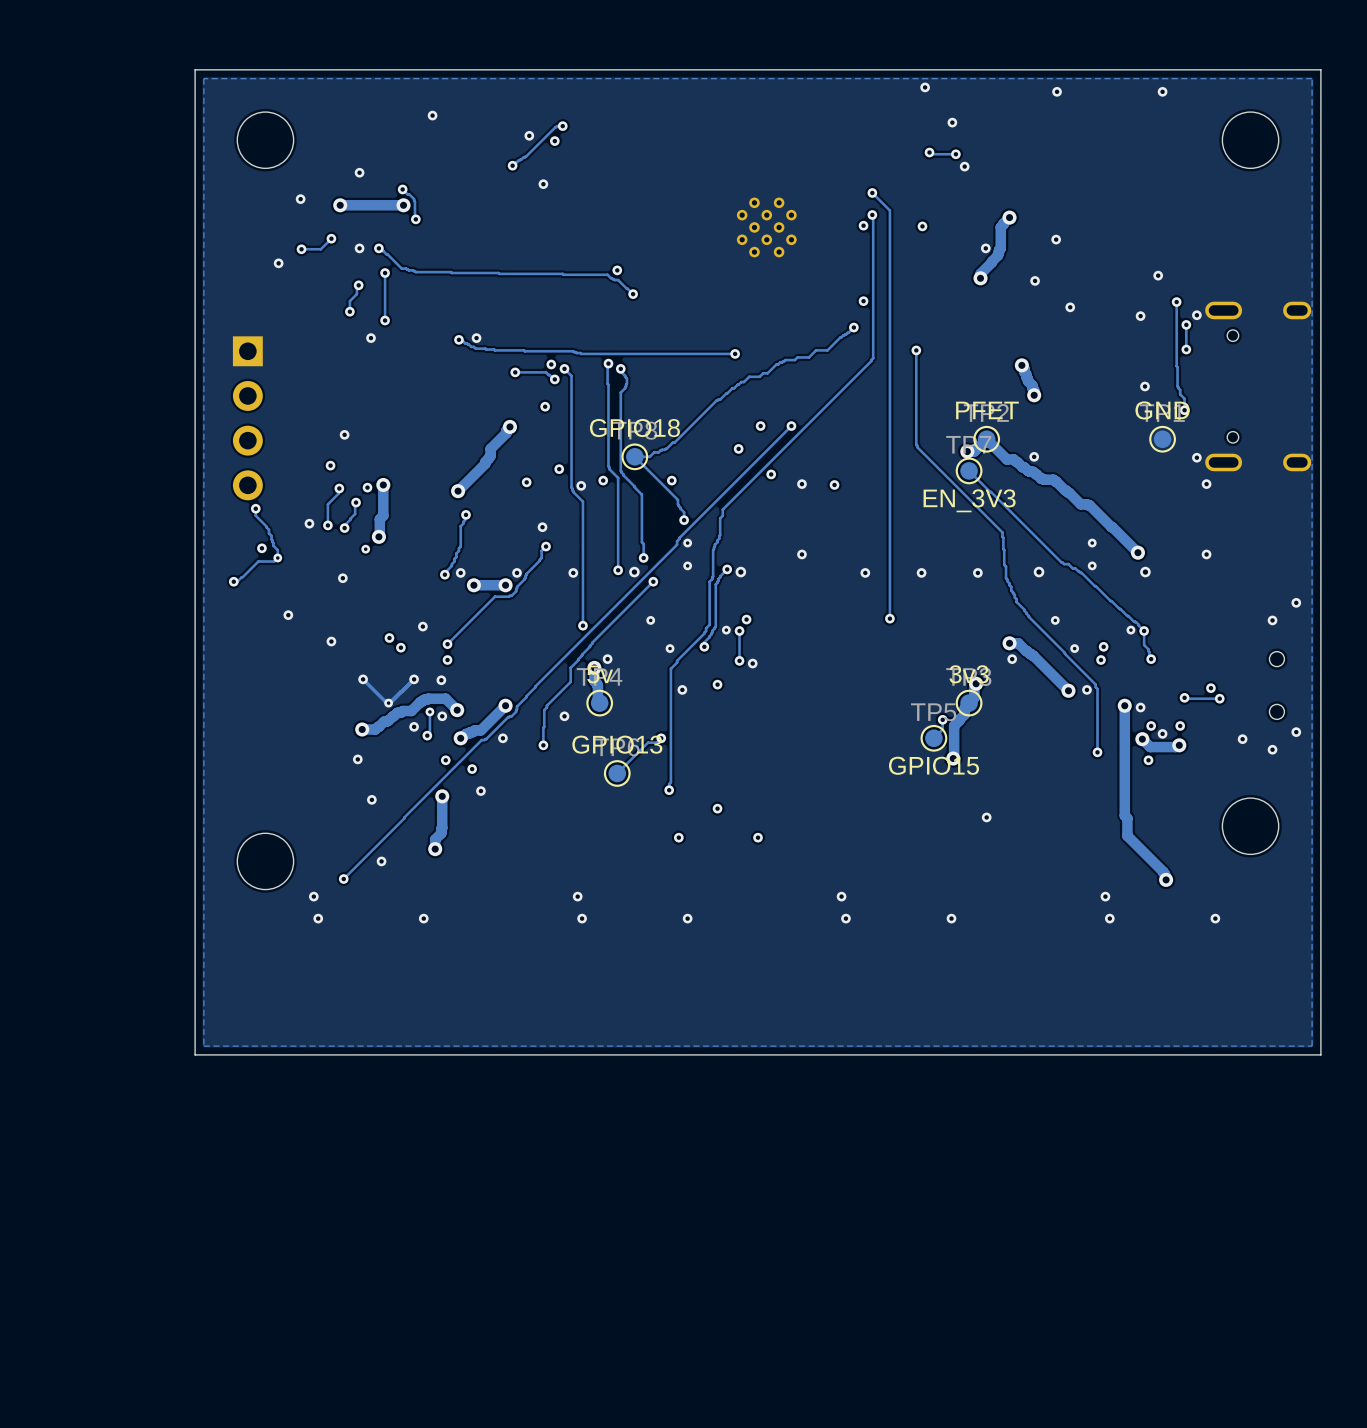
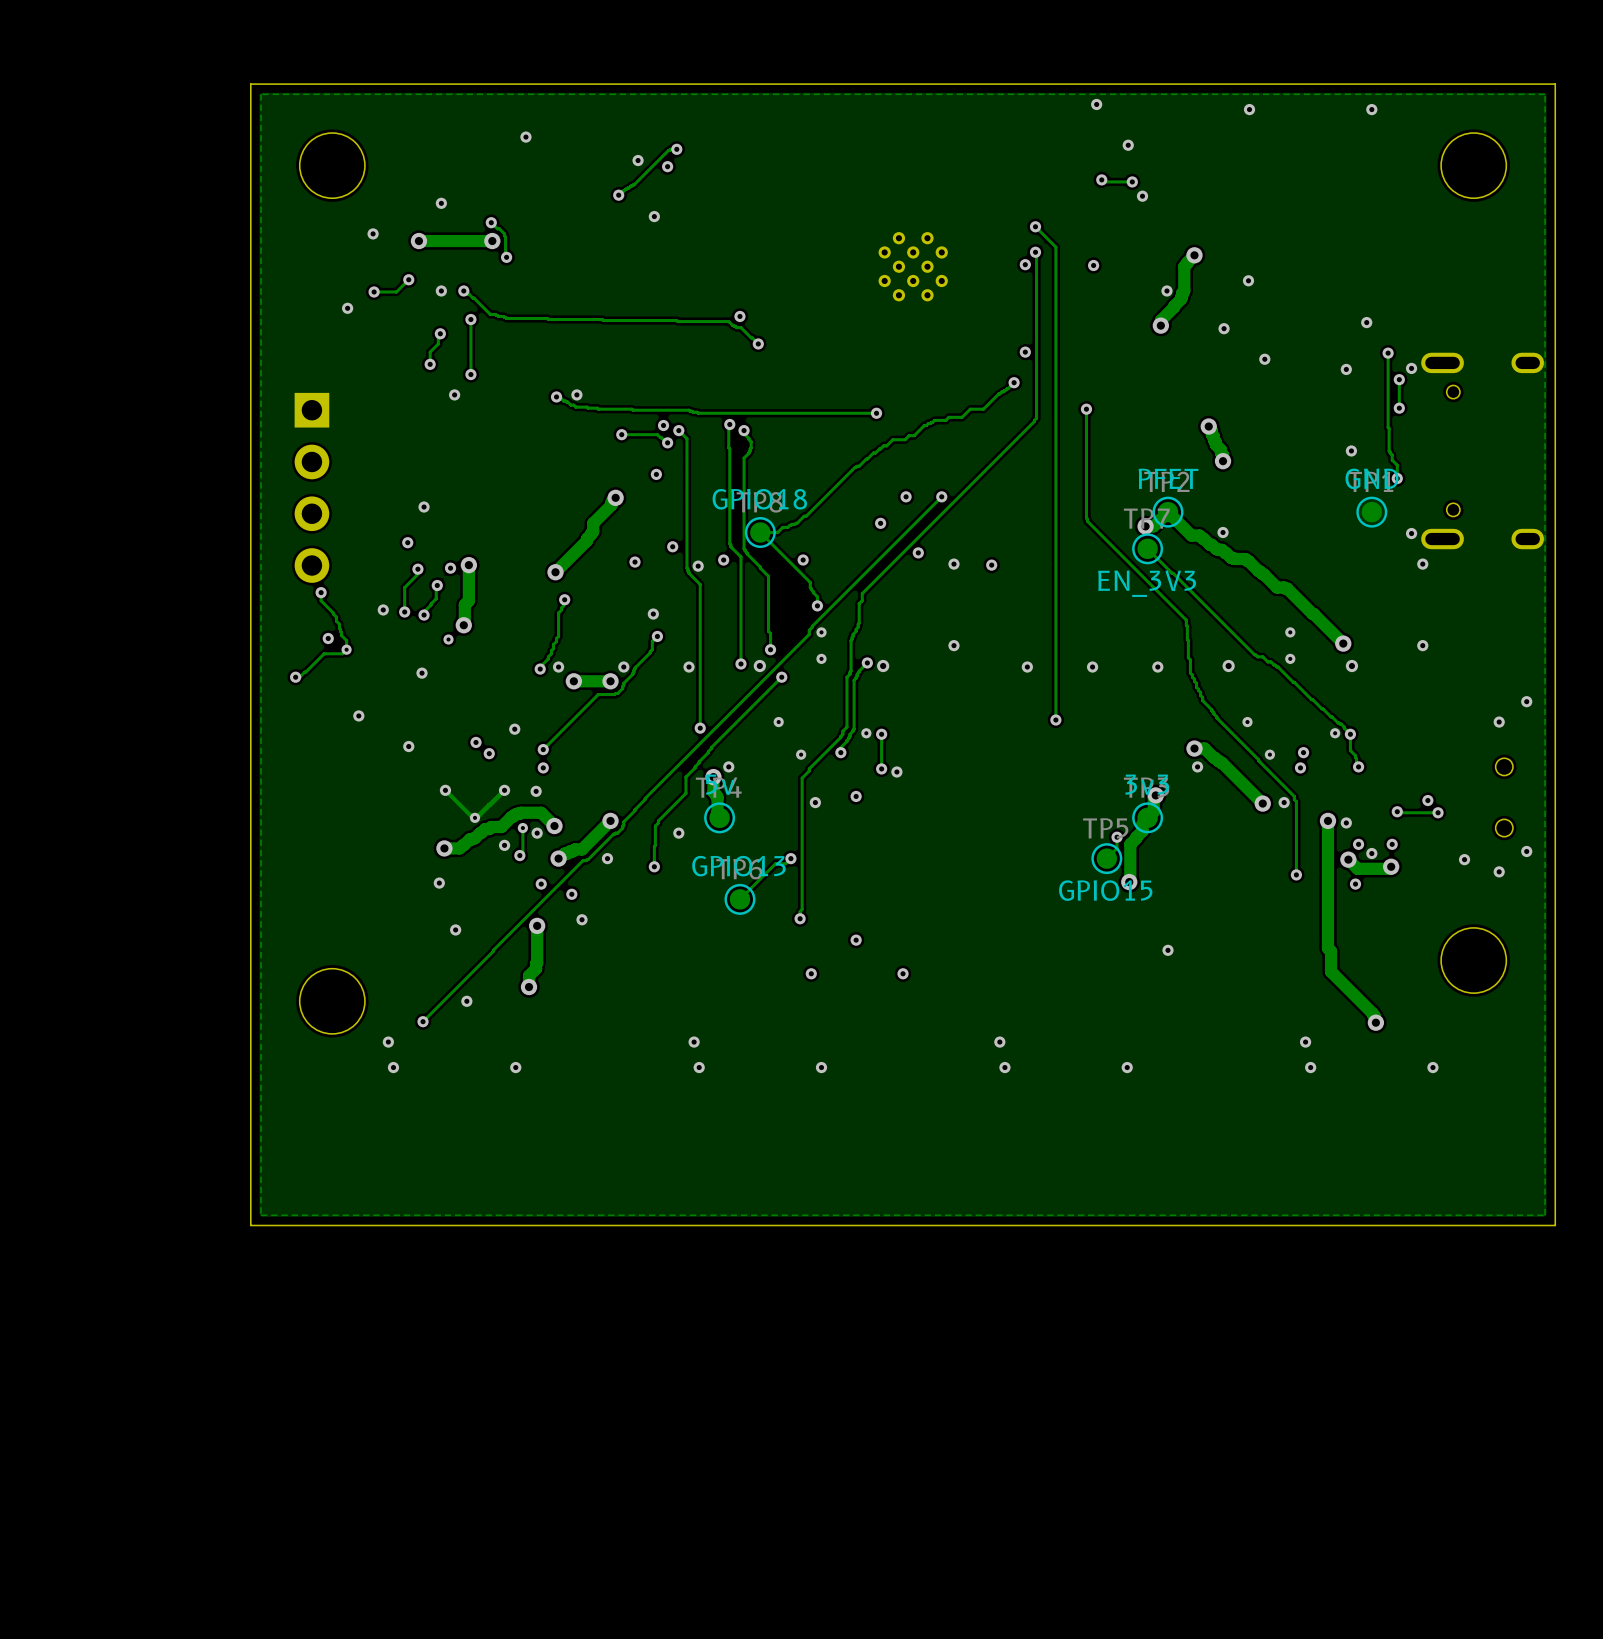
via: (746, 619) -> none

